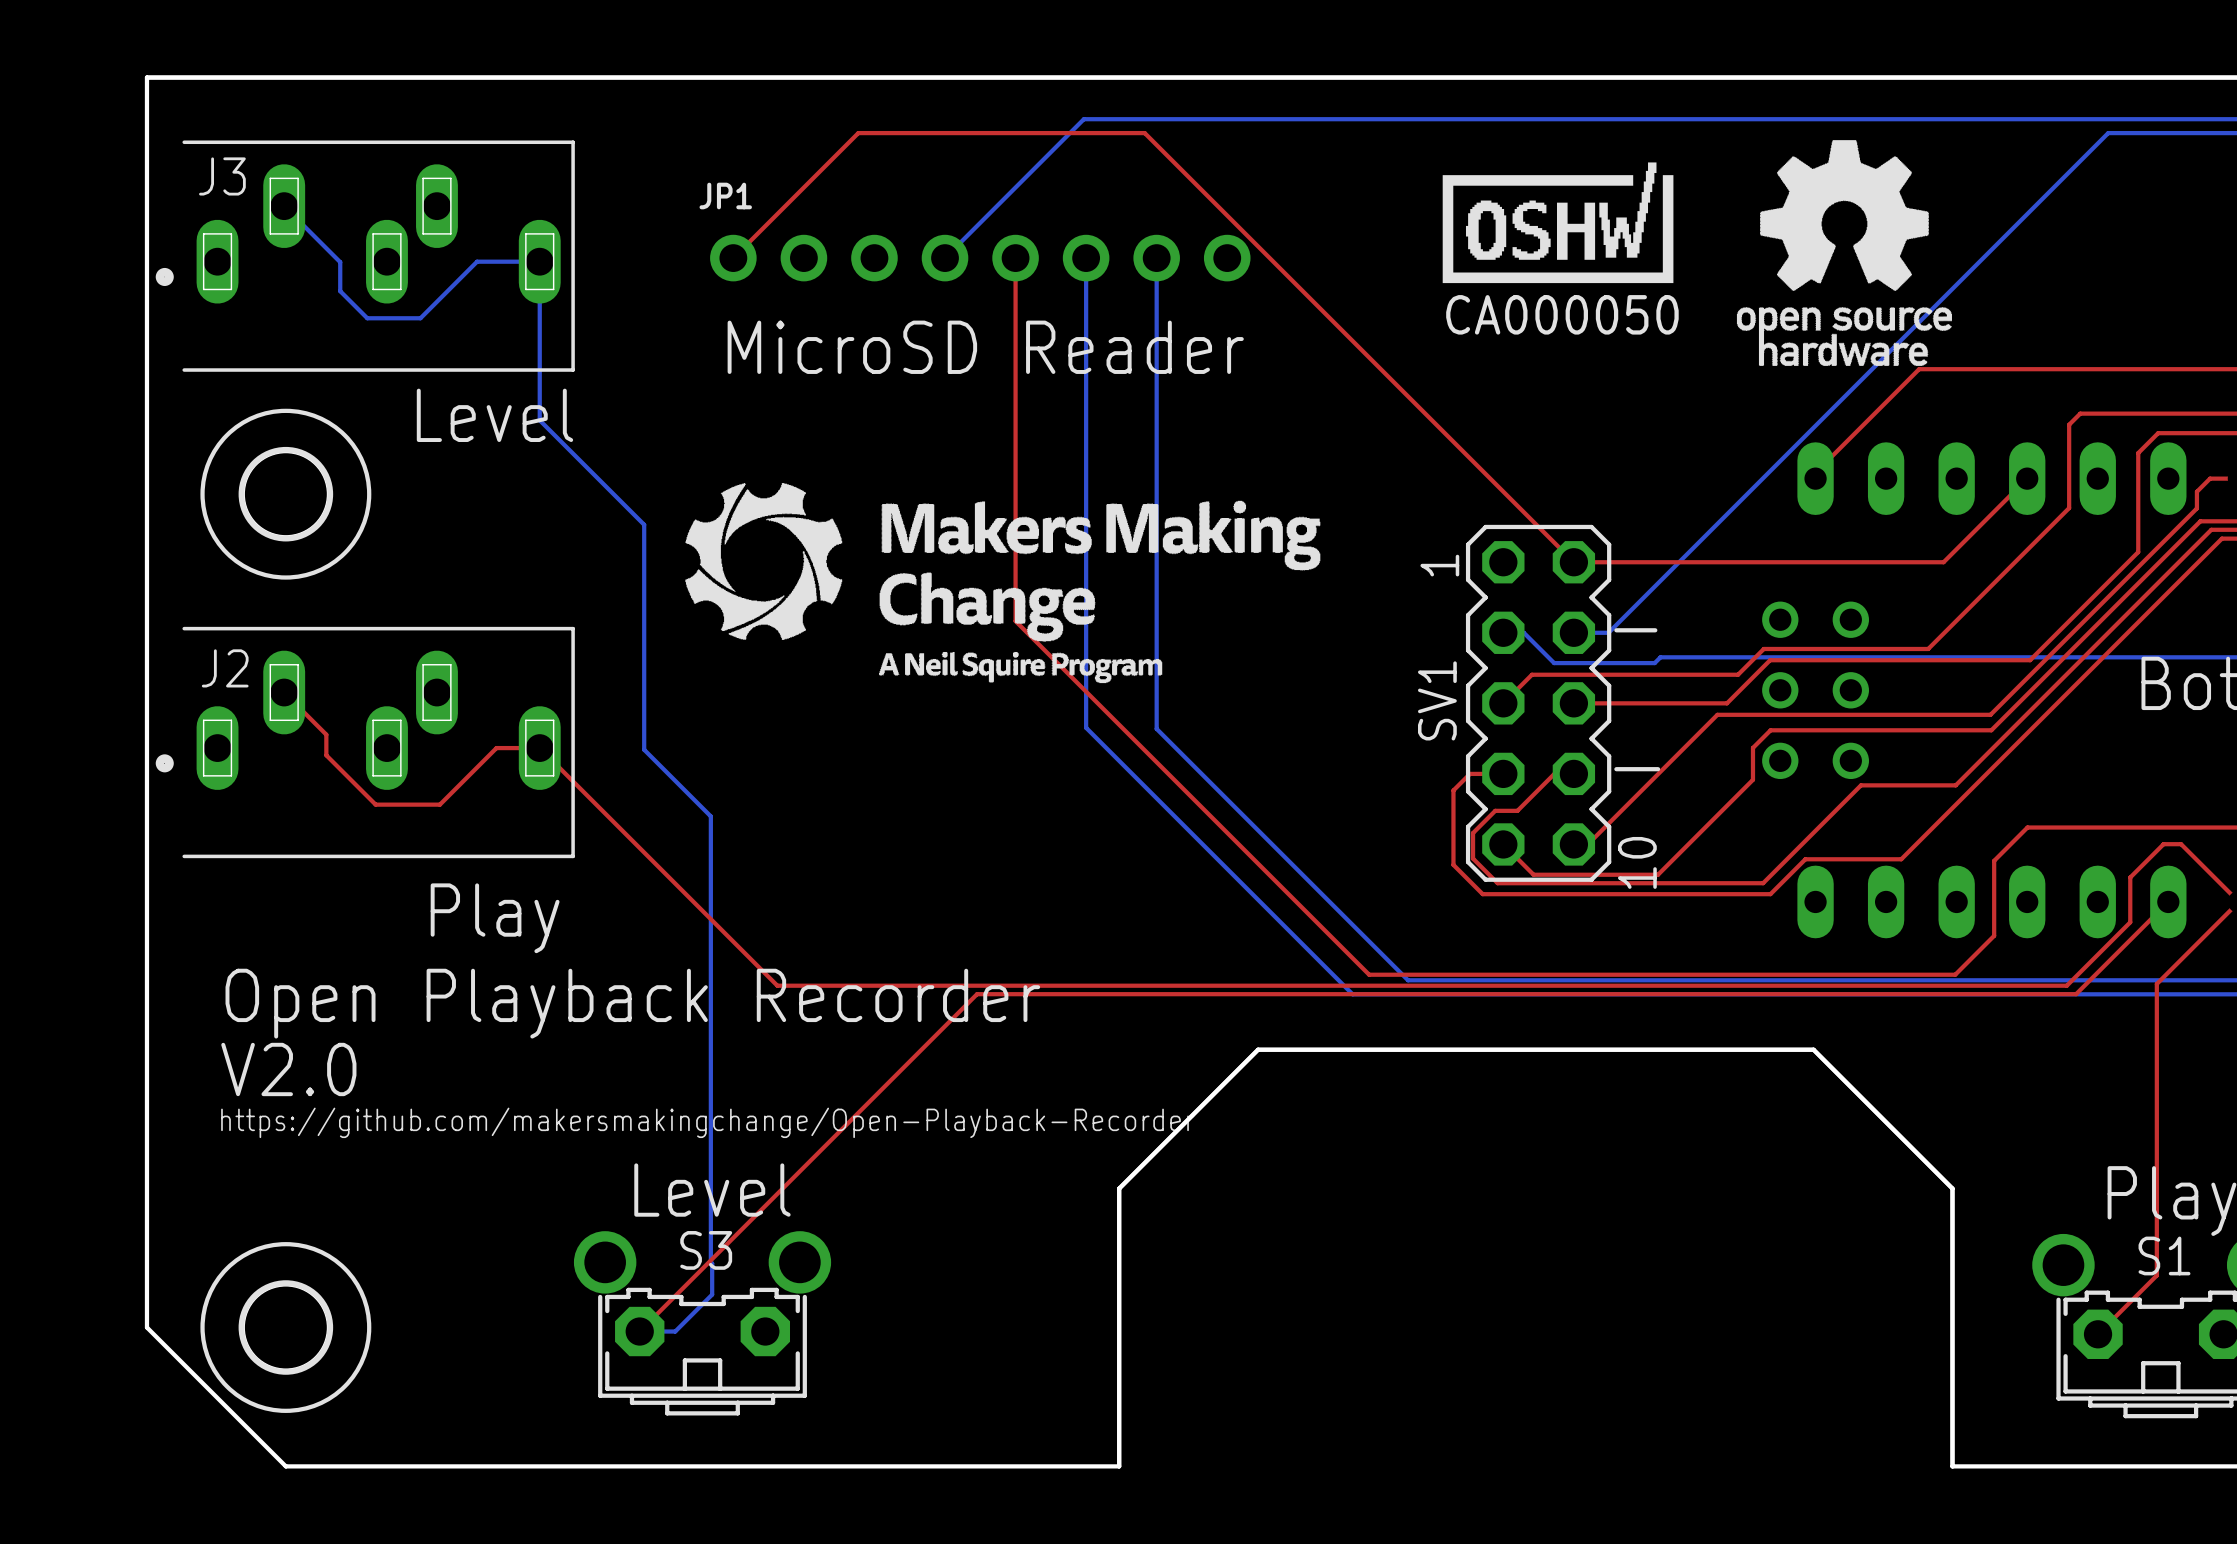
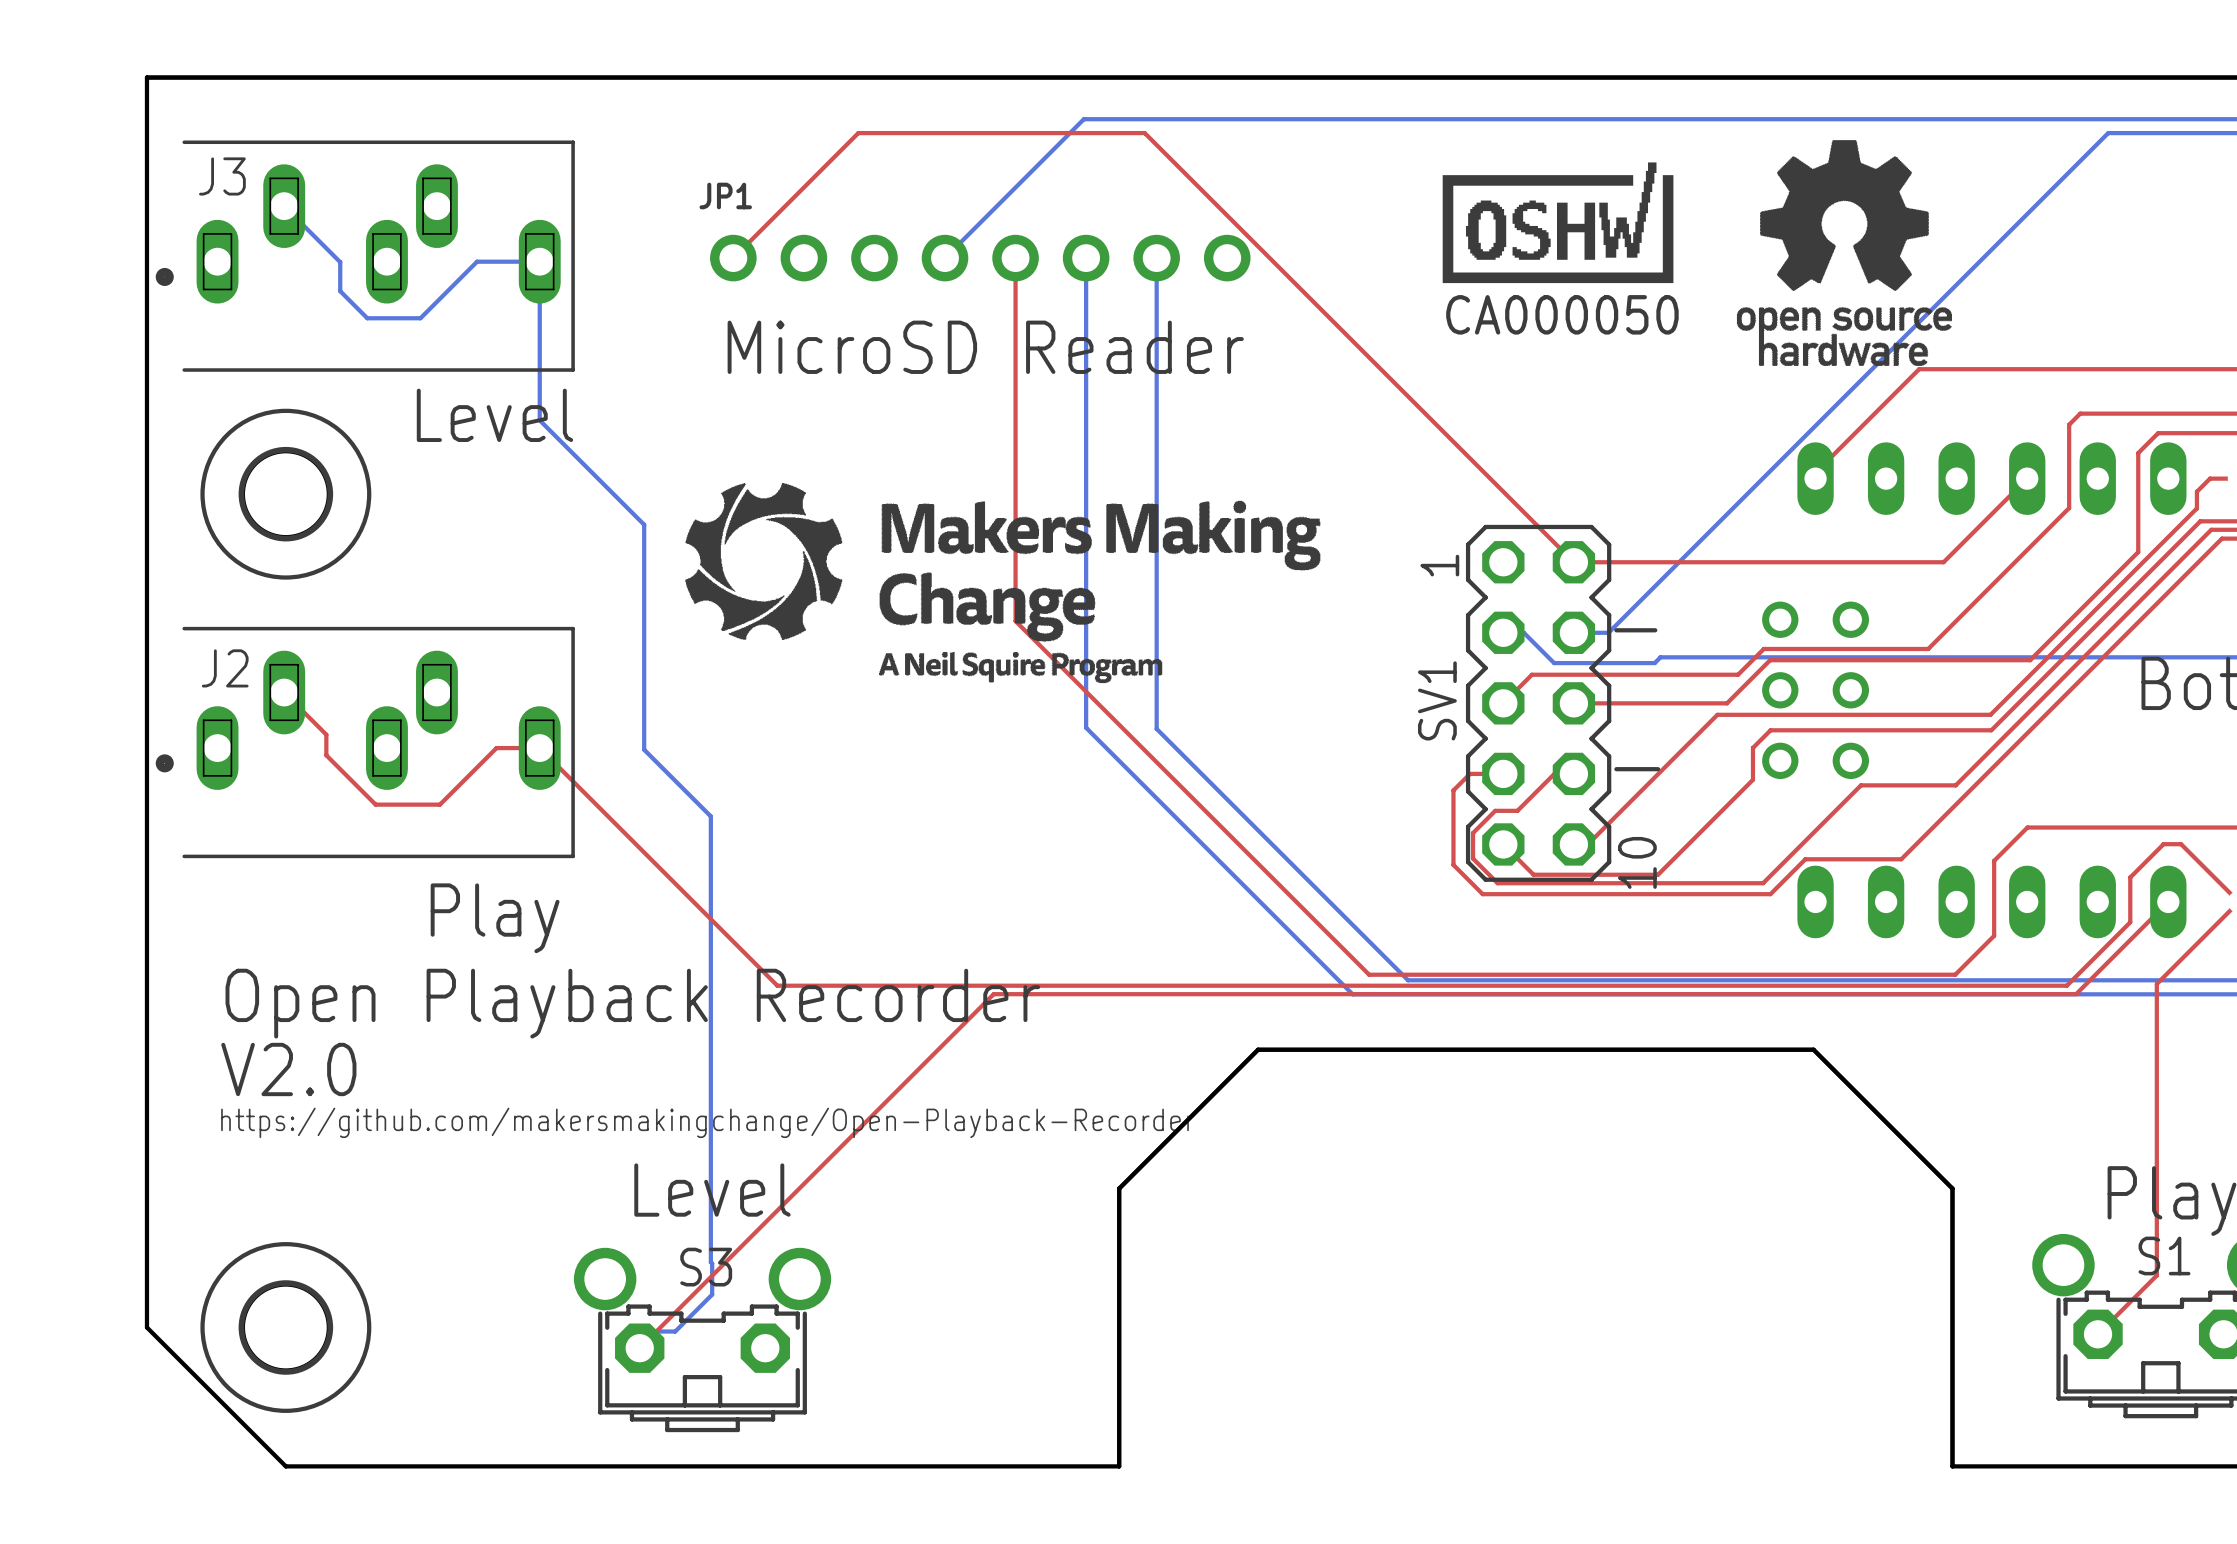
top track: (993, 994) (977, 994) (639, 1331) -> (993, 994) (639, 1348)
S3 position: (702, 1323) -> (702, 1339)

